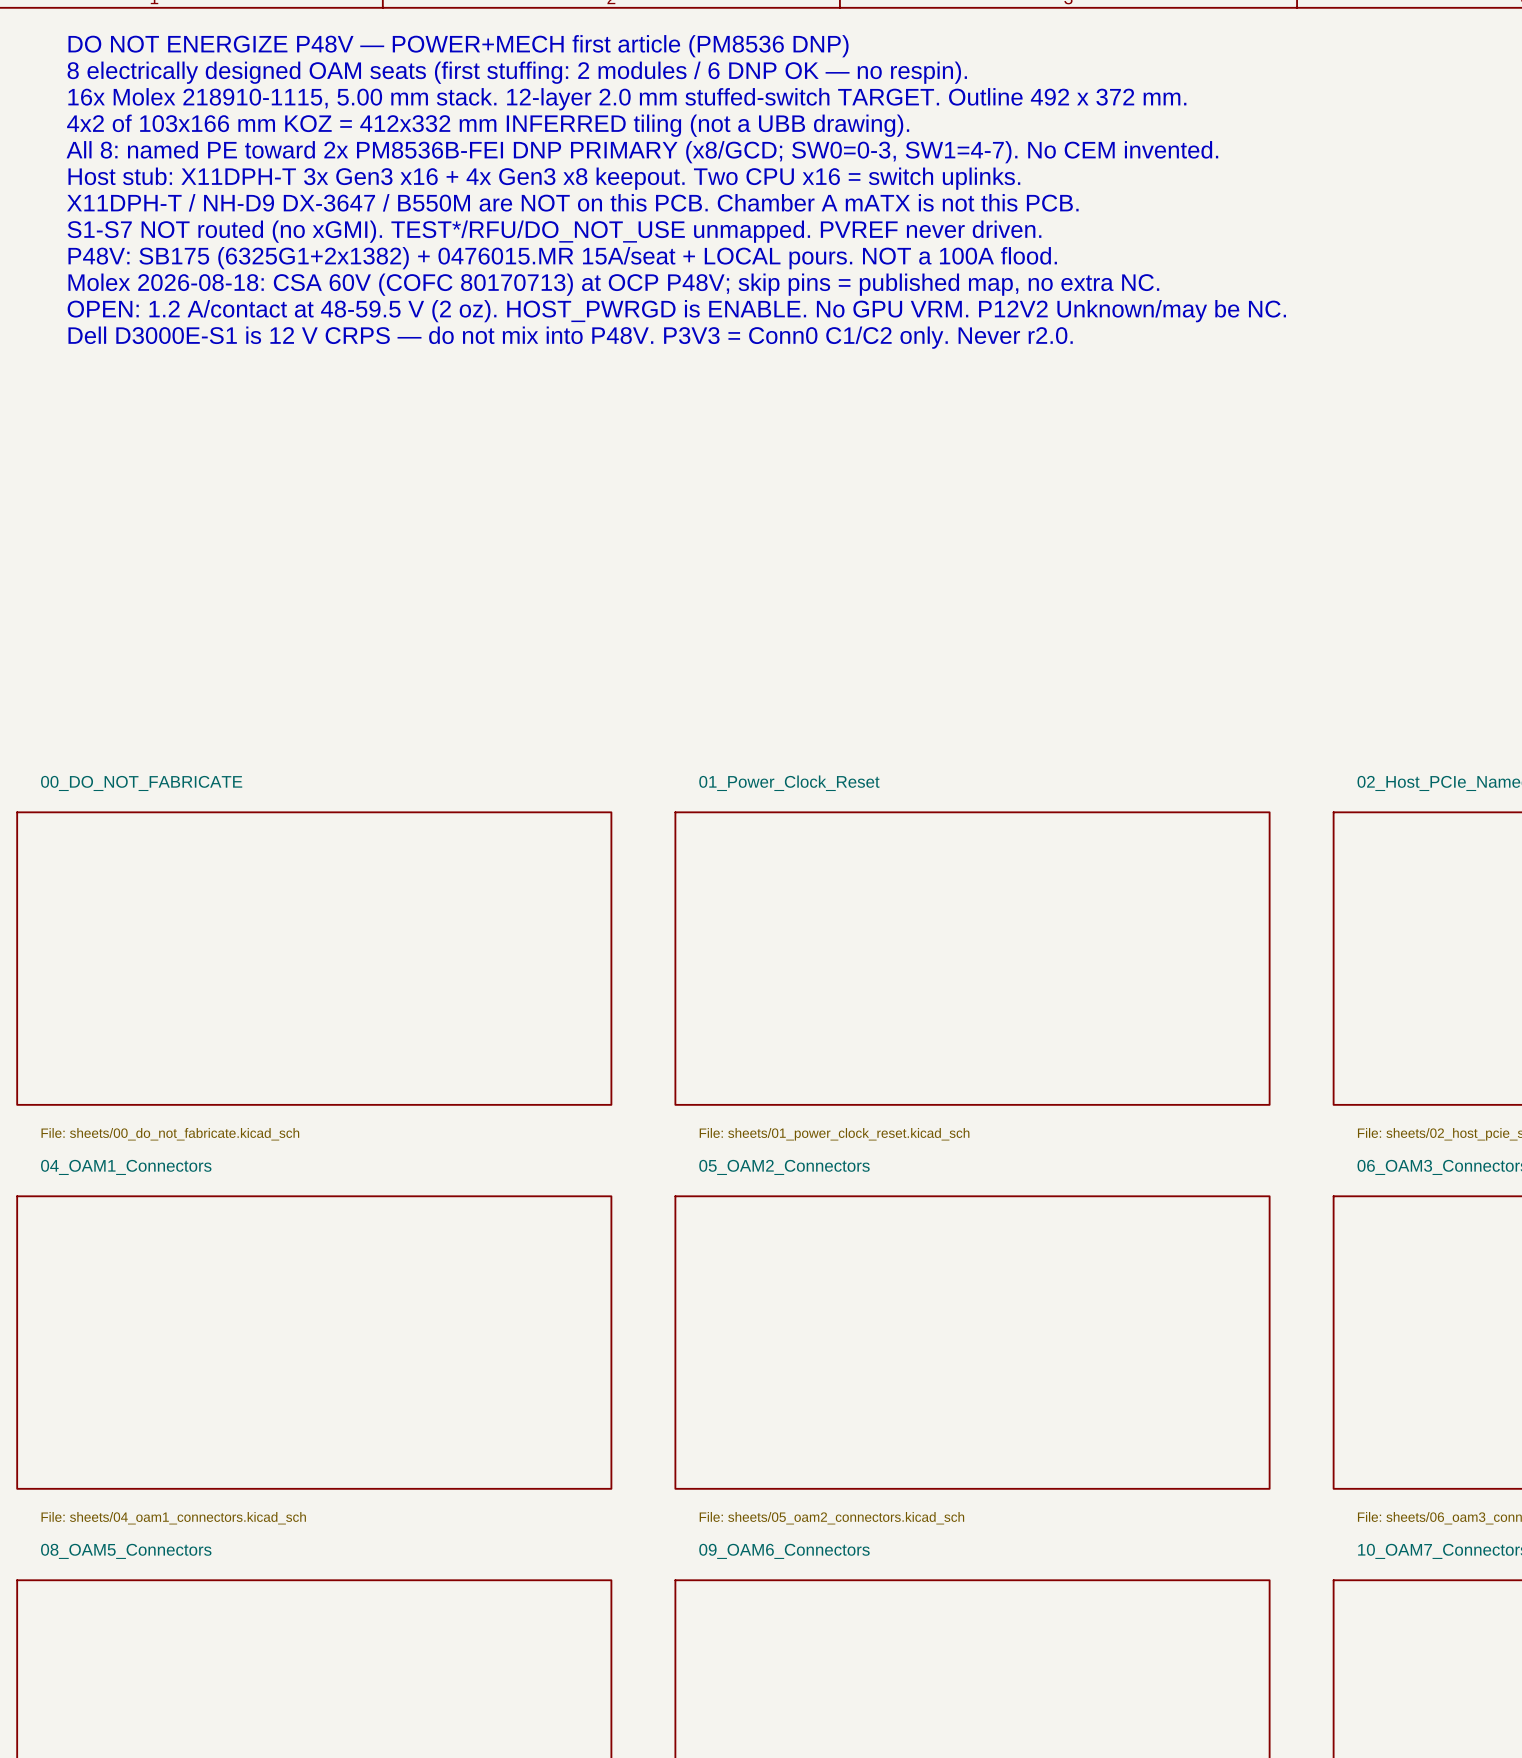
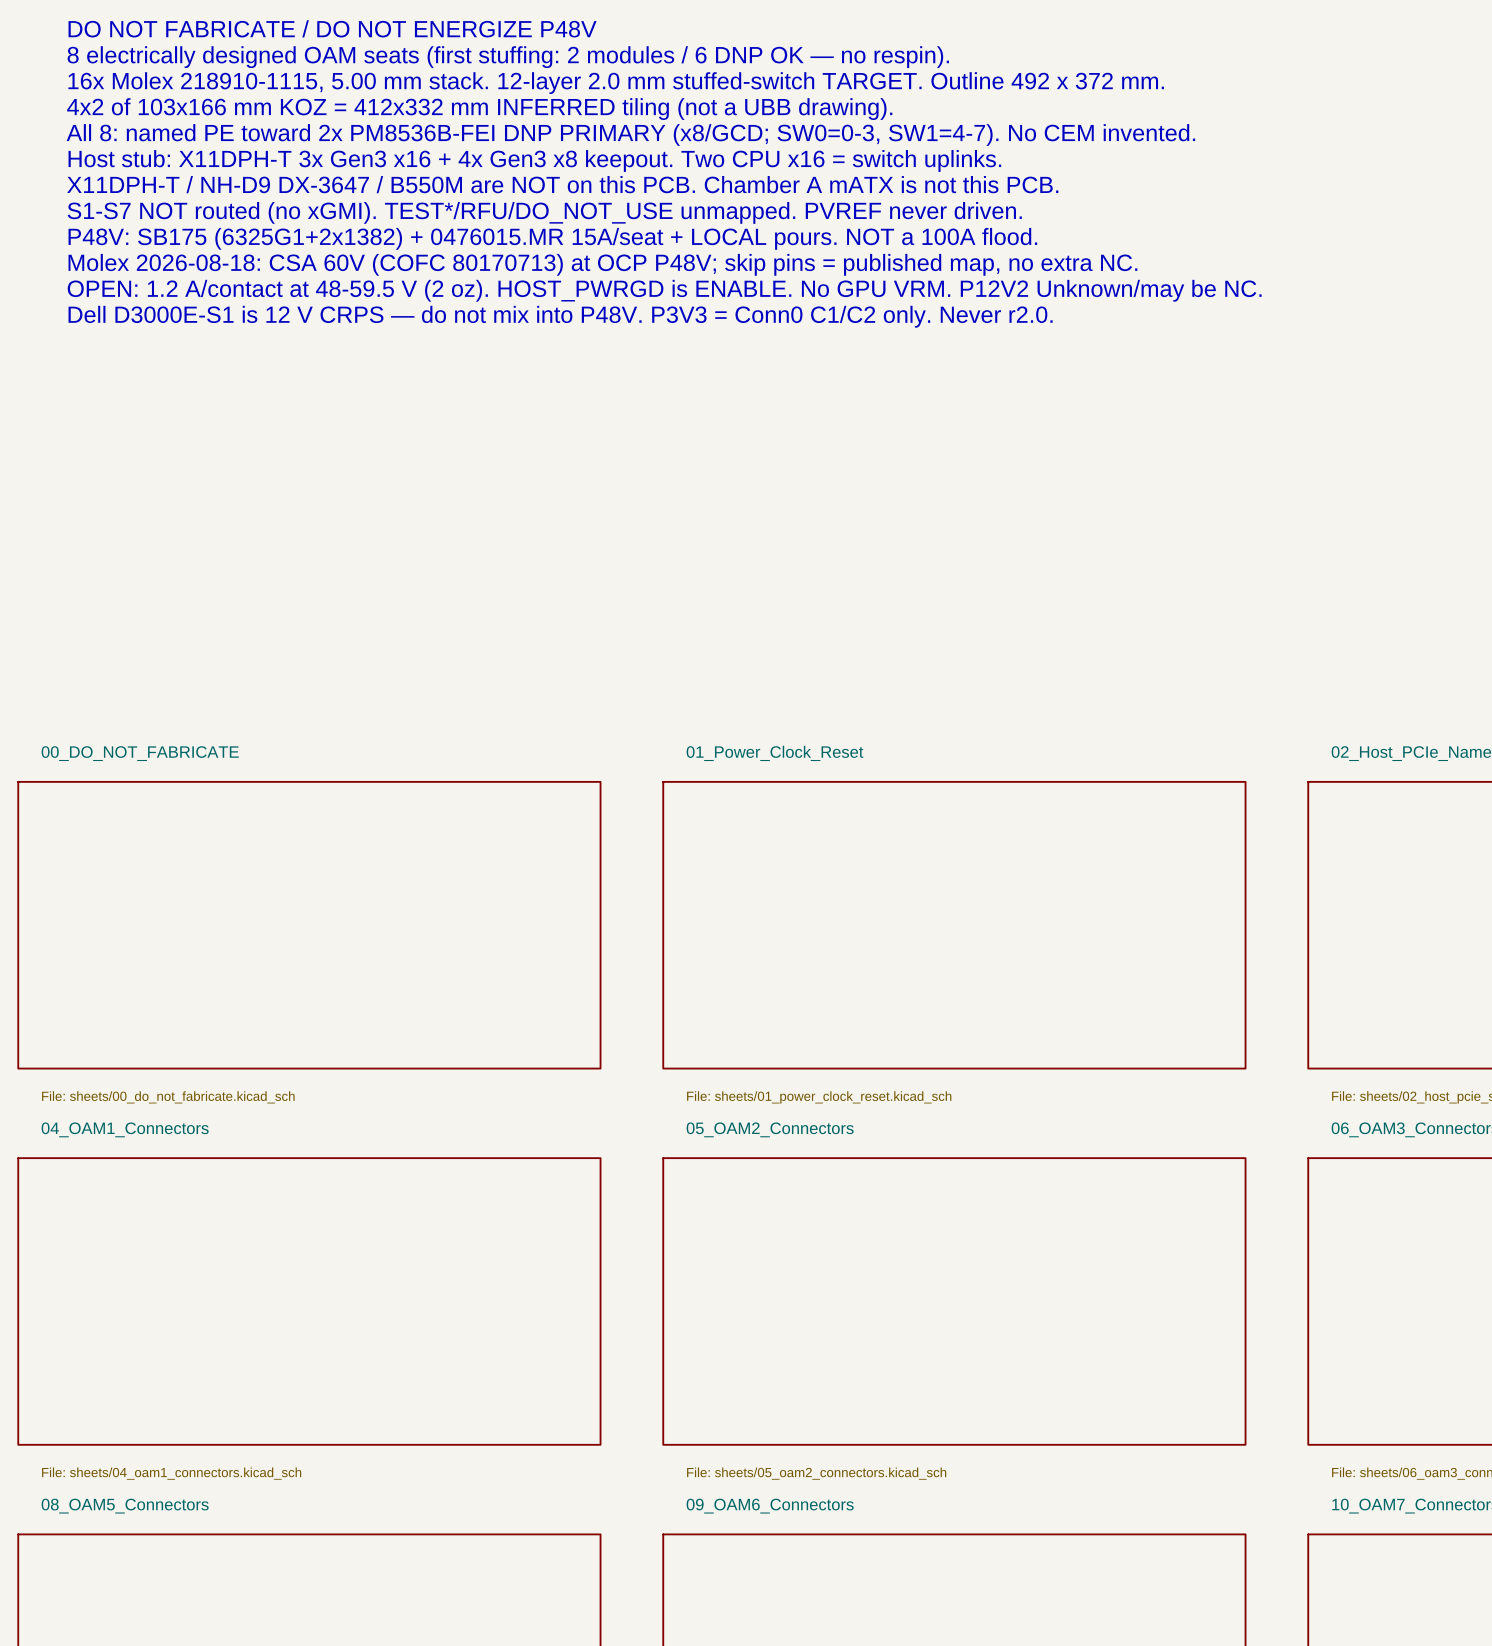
text: DO NOT ENERGIZE P48V — POWER+MECH first article (PM8536 DNP) (458, 46) -> DO NOT FABRICATE / DO NOT ENERGIZE P48V (332, 28)

